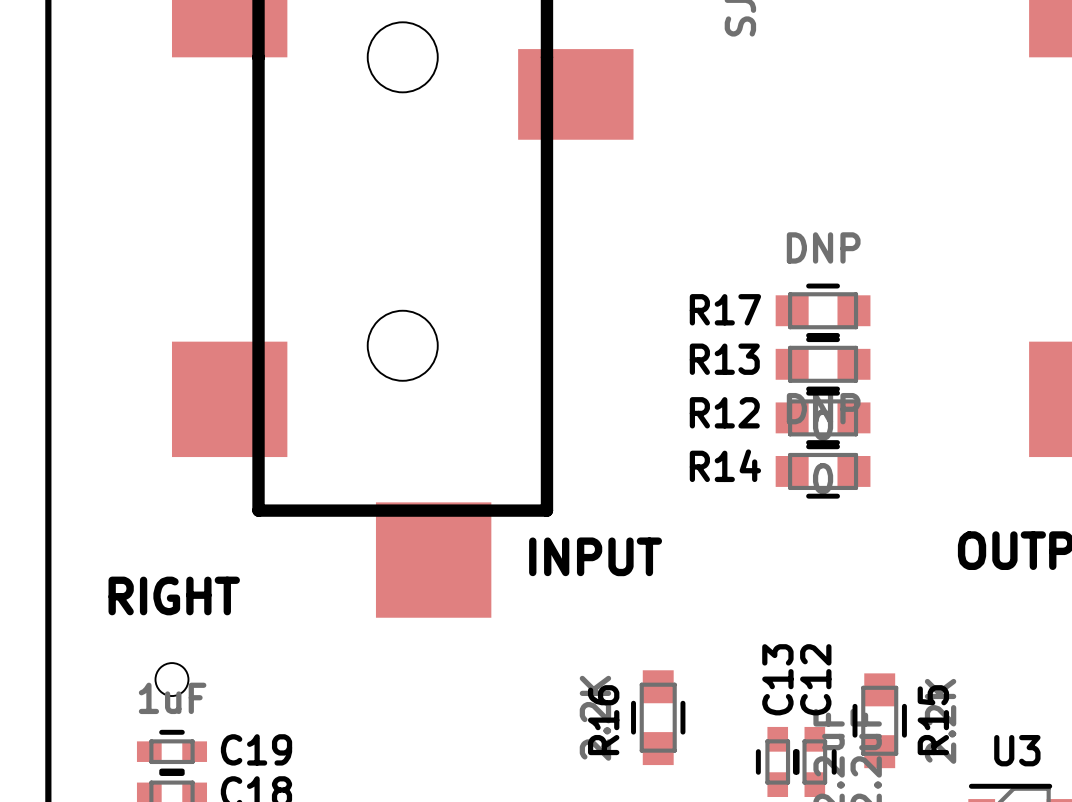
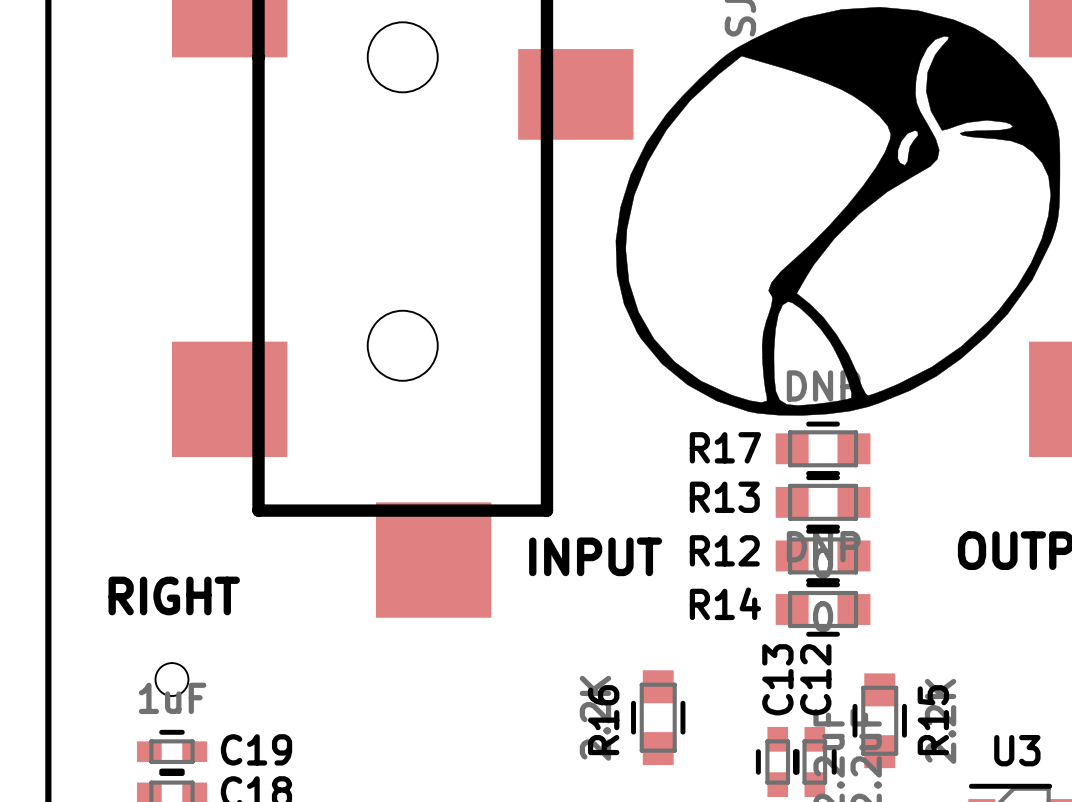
drawing: none -> [615, 6, 1061, 416]
R17 position: (823, 310) -> (823, 448)
R13 position: (823, 364) -> (823, 502)
R12 position: (823, 417) -> (823, 555)
R14 position: (823, 471) -> (823, 609)

